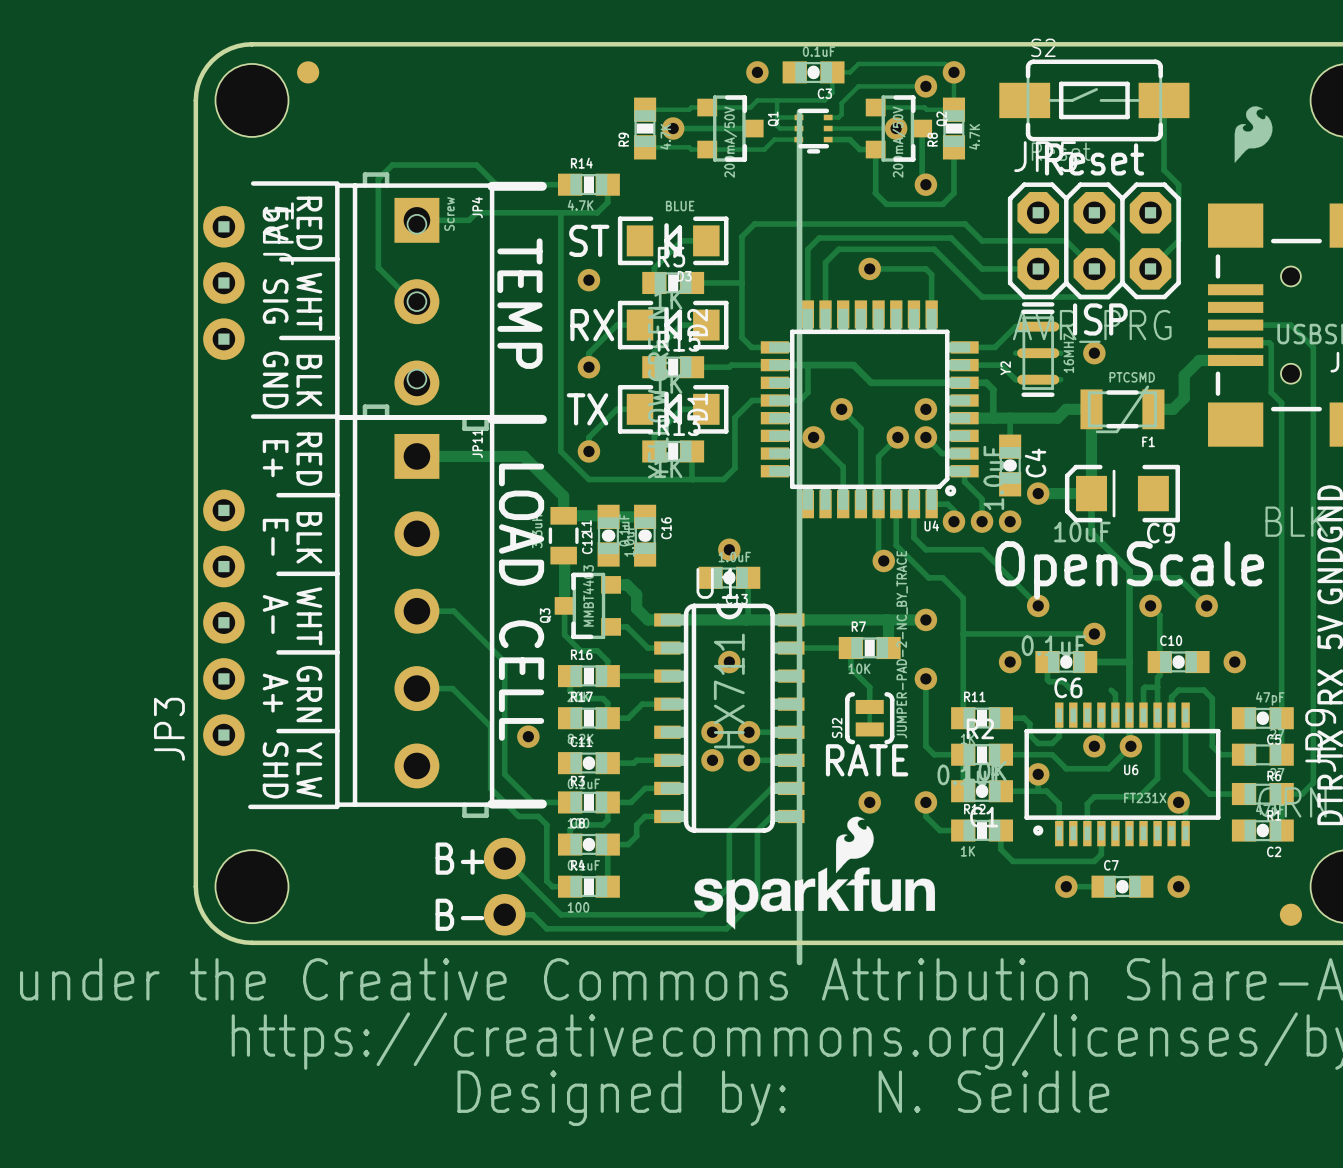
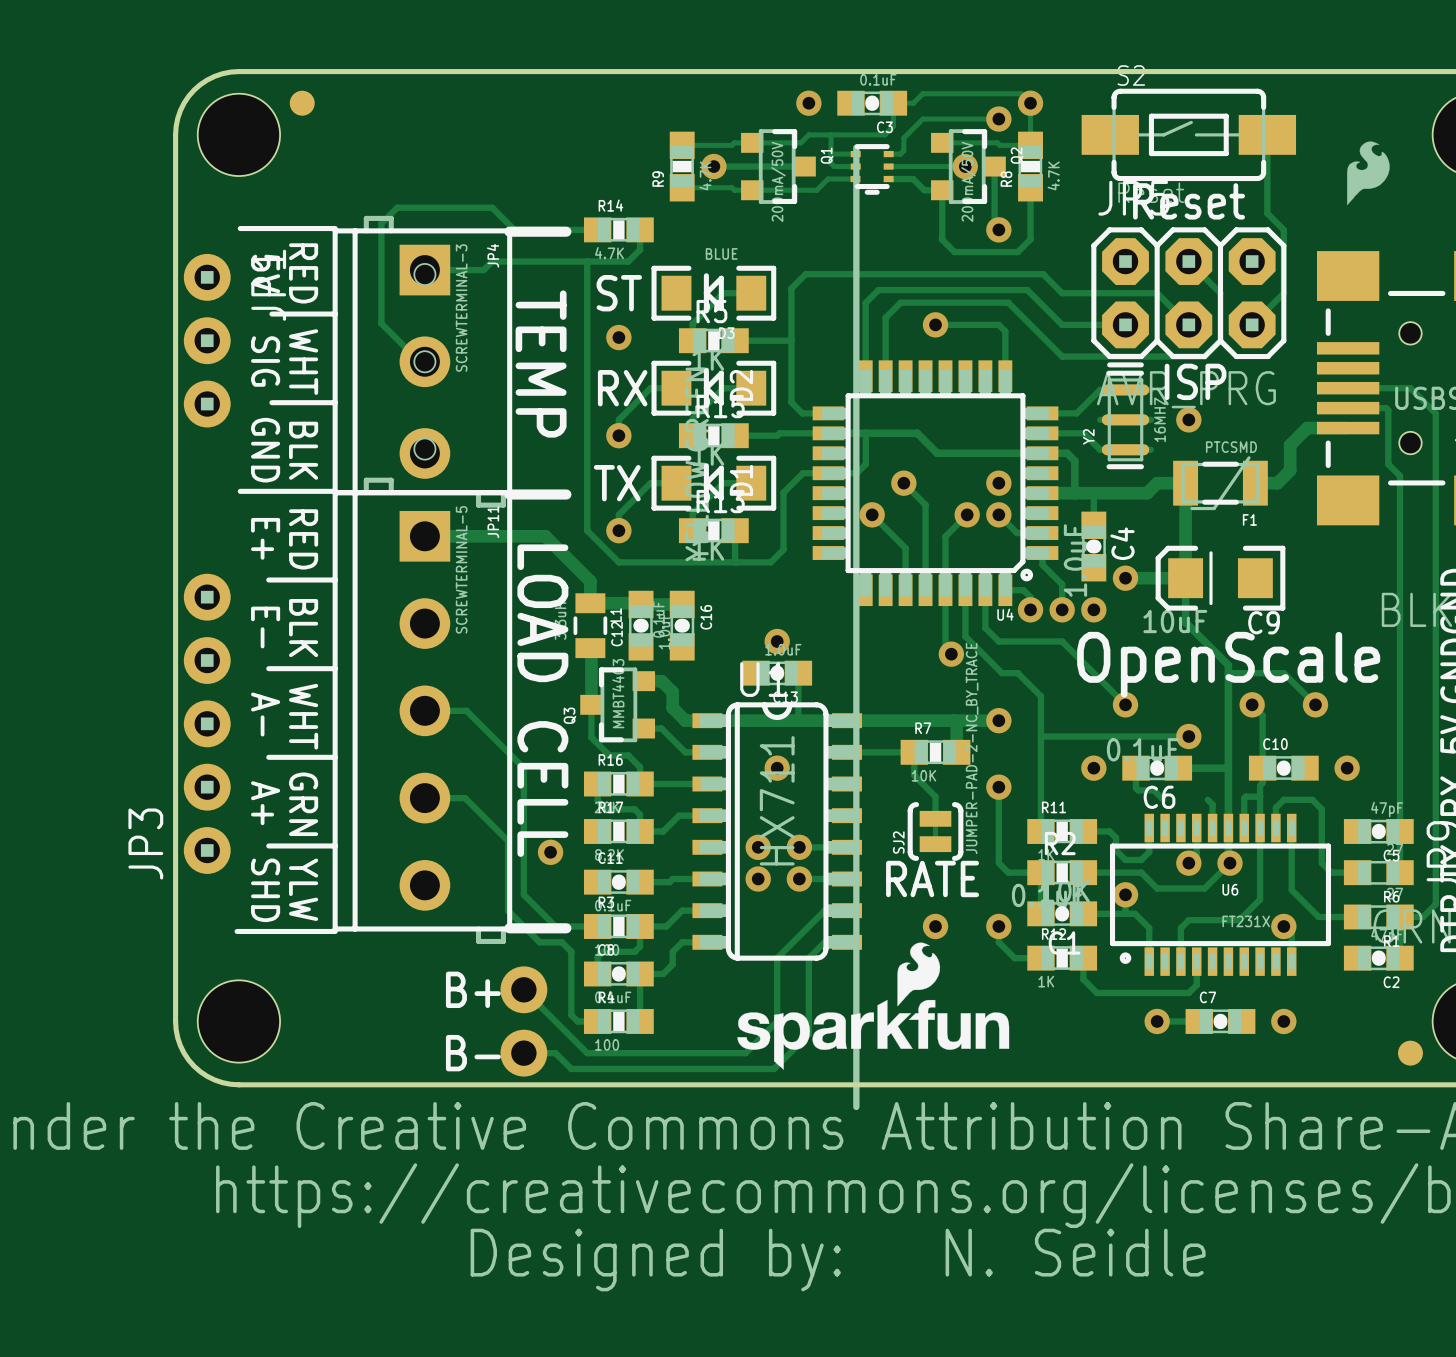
JP4 value: Screw (449, 213) -> SCREWTERMINAL-3 (461, 308)
JP11 value: none -> SCREWTERMINAL-5 (461, 569)

